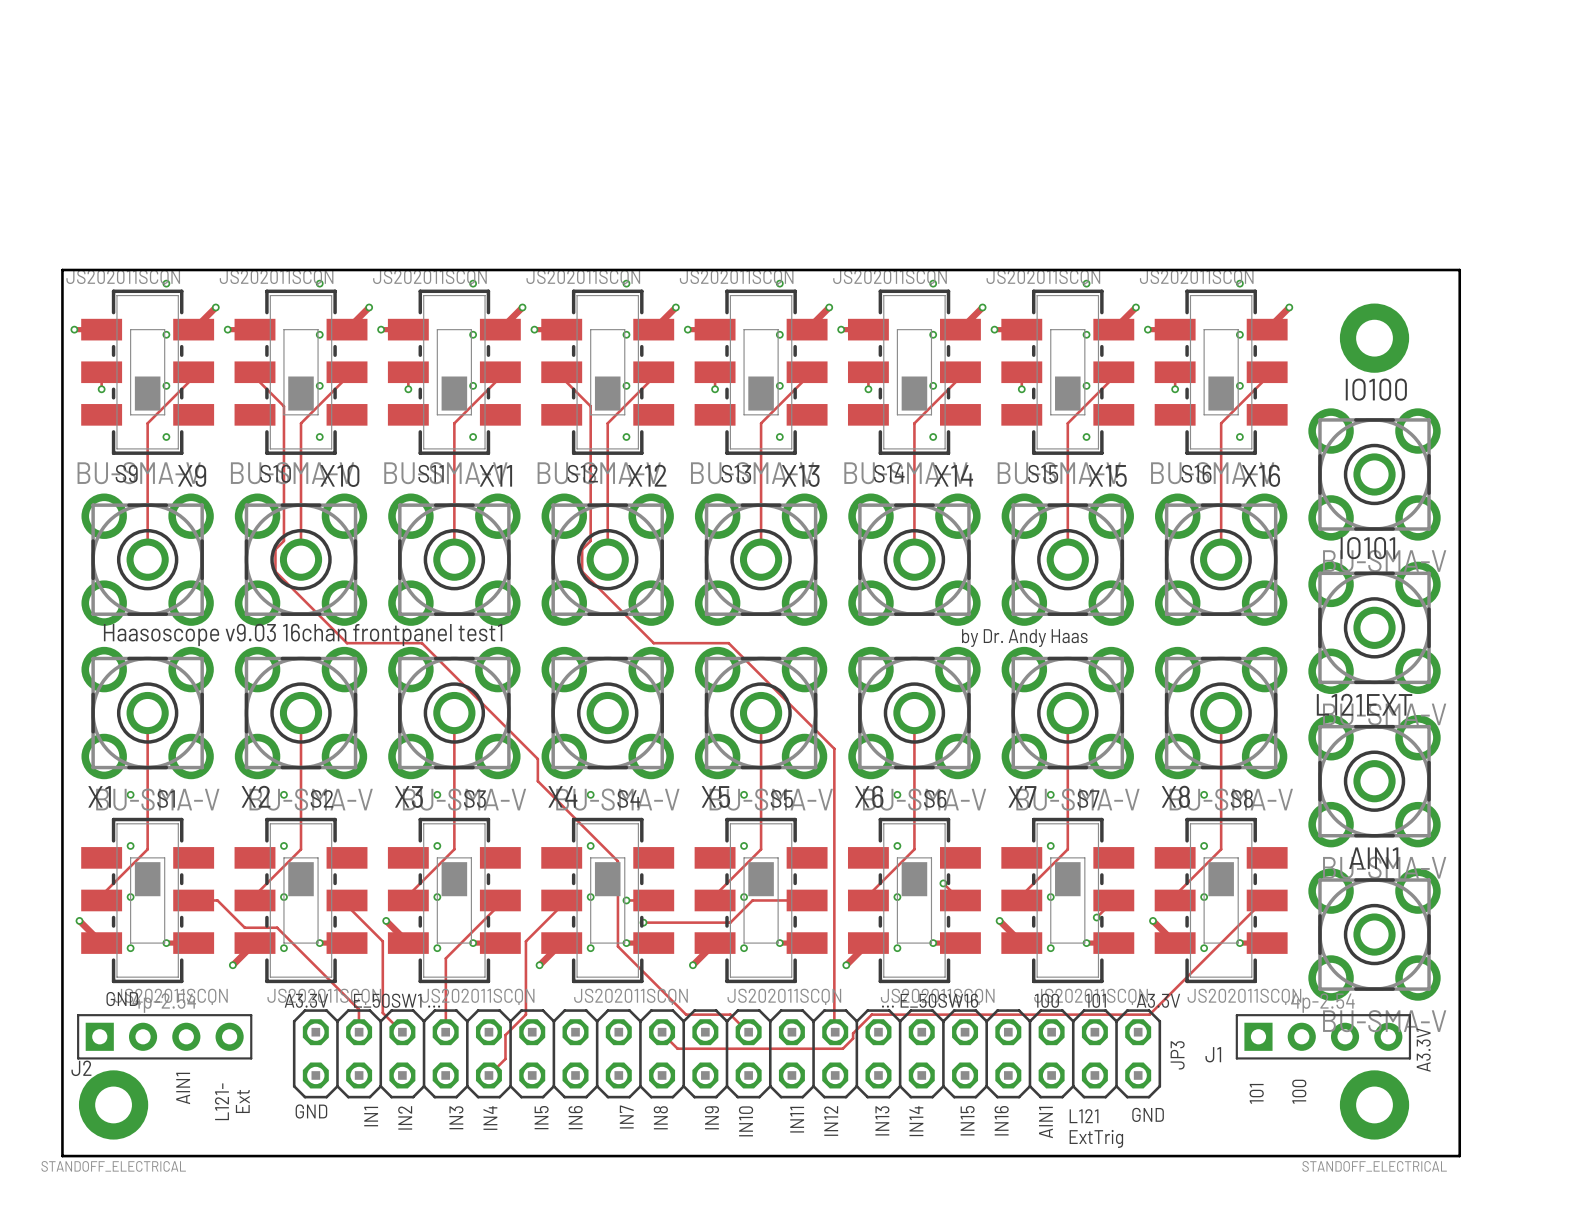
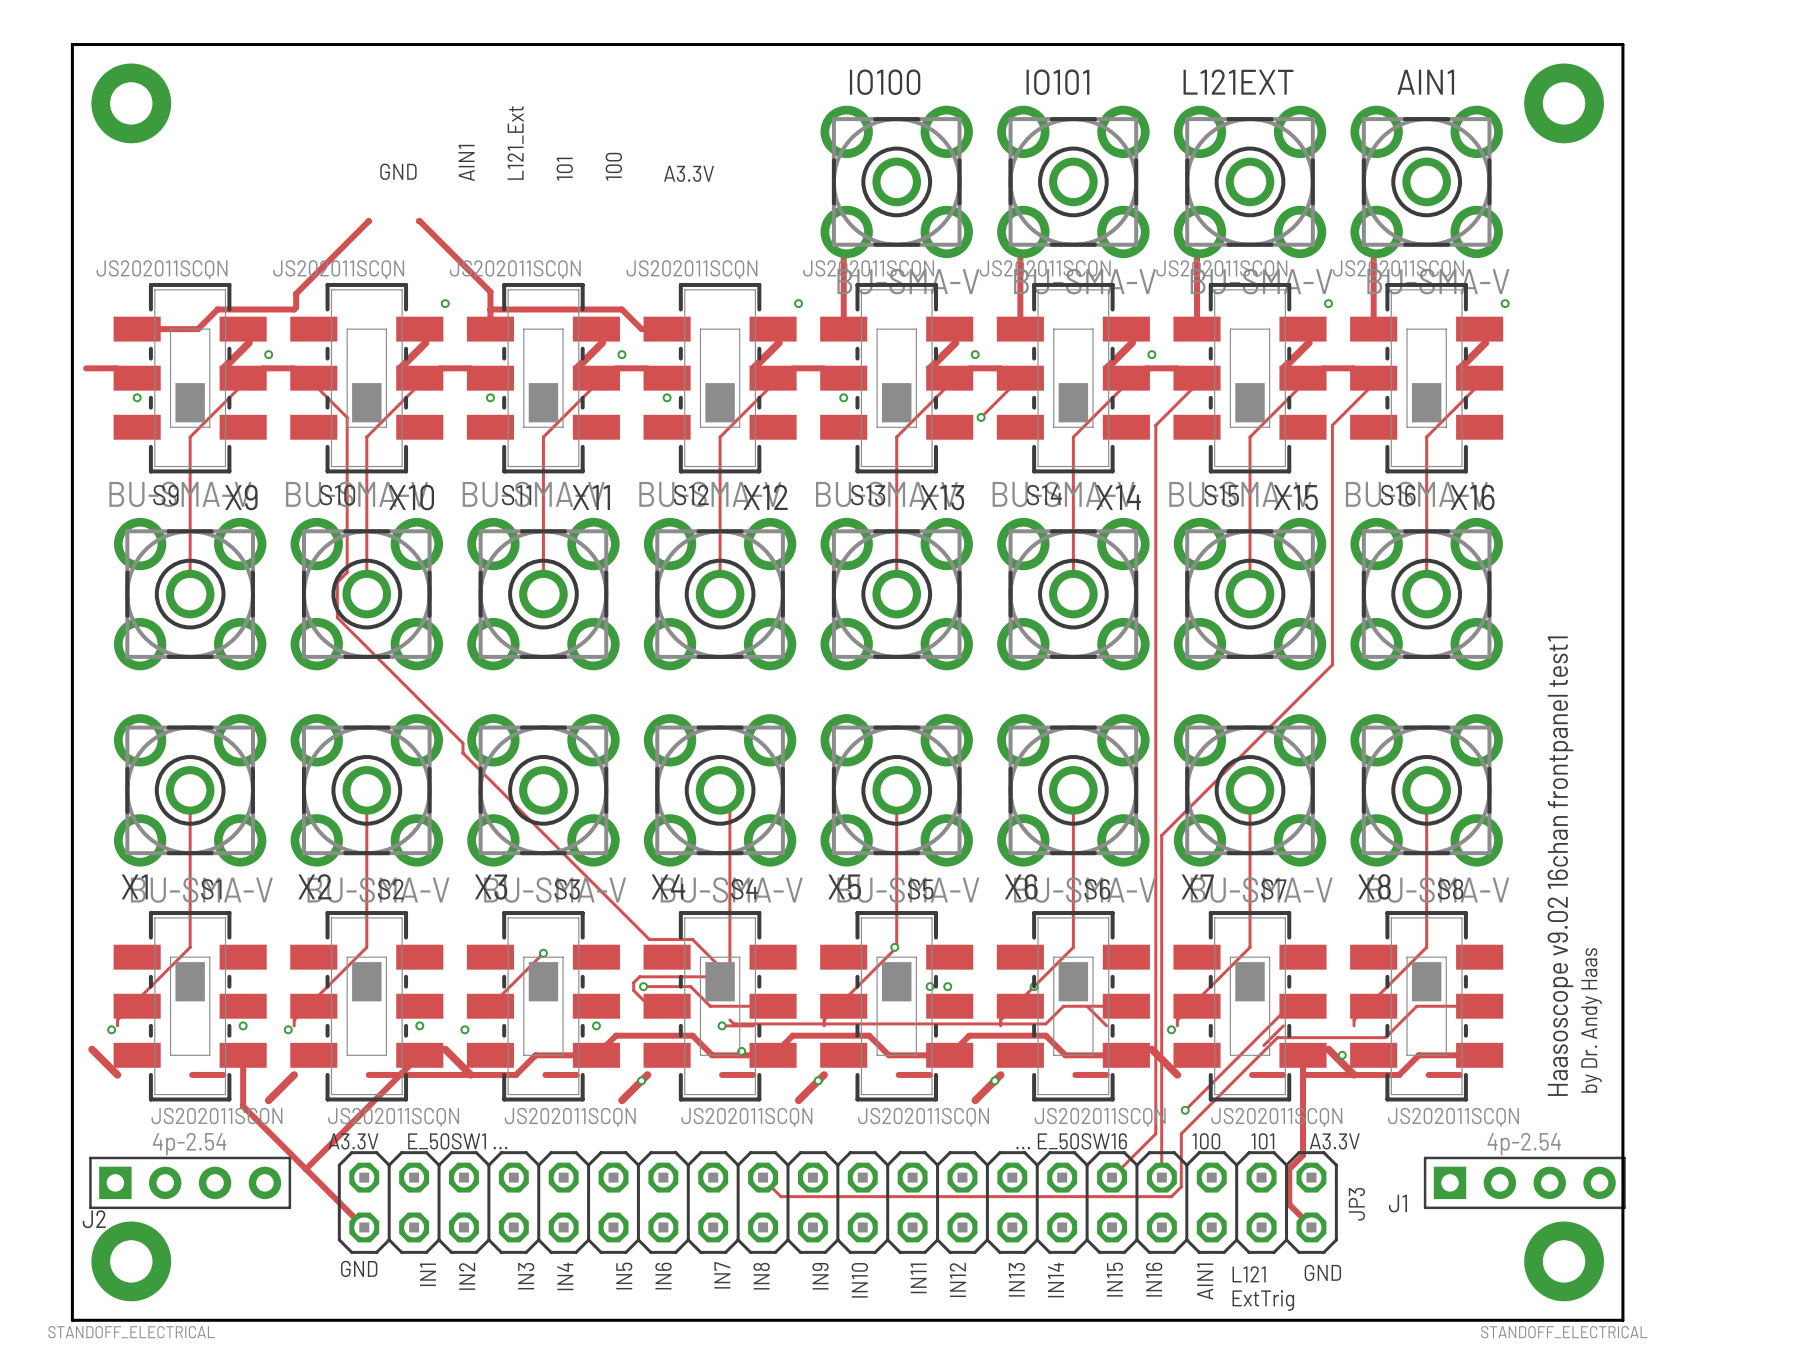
part: none -> (131, 103)
text: none -> L121_Ext (515, 143)
text: none -> AIN1 (466, 162)
text: none -> 100 (613, 166)
text: none -> 101 (564, 169)
text: none -> GND (398, 171)
text: none -> A3.3V (689, 173)
track: none -> (368, 221) (296, 293) (296, 307) (294, 309) (217, 309) (198, 329) (137, 329)
track: none -> (418, 221) (490, 291) (490, 329)
track: none -> (846, 231) (843, 234) (843, 329)
track: none -> (1023, 231) (1020, 234) (1020, 329)
track: none -> (1199, 231) (1197, 234) (1197, 329)
track: none -> (1376, 231) (1373, 234) (1373, 329)
board edge: (62, 270) (1459, 270) (1459, 1156) (1408, 1156) -> (72, 299) (72, 44) (1622, 44) (1622, 1320)
via: none -> (445, 303)
via: none -> (798, 303)
via: none -> (1328, 303)
via: none -> (1505, 303)
track: none -> (490, 309) (621, 309) (641, 329) (667, 329)
via: (166, 283) -> none
via: (319, 283) -> none
via: (473, 283) -> none
via: (626, 283) -> none
via: (779, 283) -> none
via: (933, 283) -> none
via: (1086, 283) -> none
via: (1239, 283) -> none
via: (215, 307) -> none
via: (369, 307) -> none
via: (522, 307) -> none
via: (675, 307) -> none
via: (829, 307) -> none
via: (982, 307) -> none
via: (1135, 307) -> none
via: (1289, 307) -> none
via: none -> (268, 354)
via: none -> (621, 354)
via: none -> (975, 354)
via: none -> (1151, 354)
via: (74, 329) -> none
via: (227, 329) -> none
via: (381, 329) -> none
via: (534, 329) -> none
via: (687, 329) -> none
via: (841, 329) -> none
via: (994, 329) -> none
via: (1147, 329) -> none
via: (166, 334) -> none
via: (319, 334) -> none
via: (473, 334) -> none
via: (626, 334) -> none
via: (779, 334) -> none
via: (933, 334) -> none
via: (1086, 334) -> none
via: (1239, 334) -> none
track: none -> (419, 378) (419, 384) (366, 437) (366, 594)
track: none -> (1020, 378) (981, 417)
track: none -> (1197, 378) (1197, 384) (1155, 425) (1155, 1133) (1112, 1177)
track: none -> (1373, 378) (1373, 384) (1332, 425) (1332, 664) (1161, 835) (1161, 1177)
part position: (1374, 338) -> (1564, 103)
via: none -> (137, 397)
via: none -> (490, 397)
via: none -> (667, 397)
via: none -> (843, 397)
S9 position: (147, 372) -> (190, 378)
track: (193, 372) (193, 377) (147, 423) (147, 559) -> (243, 378) (243, 384) (190, 437) (190, 594)
track: (255, 372) (255, 377) (283, 406) (283, 540) (275, 549) (275, 571) (347, 643) (421, 643) (537, 759) (537, 781) (617, 861) (617, 946) (686, 1014) (730, 1014) (748, 1032) -> none
S10 position: (301, 372) -> (366, 378)
track: (347, 372) (347, 377) (301, 423) -> (313, 378) (313, 384) (347, 417) (347, 476)
S11 position: (454, 372) -> (543, 378)
track: (500, 372) (500, 377) (454, 423) (454, 559) -> (596, 378) (596, 384) (543, 437) (543, 594)
track: (561, 372) (561, 377) (590, 406) (590, 540) (582, 549) (582, 571) (653, 643) (728, 643) (834, 748) (835, 1032) -> none
S12 position: (607, 372) -> (720, 378)
track: (653, 372) (653, 377) (607, 423) (607, 559) -> (773, 378) (773, 384) (720, 437) (720, 594)
S13 position: (761, 372) -> (896, 378)
track: (807, 372) (807, 377) (761, 423) (761, 559) -> (949, 378) (949, 384) (896, 437) (896, 594)
via: none -> (981, 417)
S14 position: (914, 372) -> (1073, 378)
track: (960, 372) (960, 377) (914, 423) (914, 559) -> (1126, 378) (1126, 384) (1073, 437) (1073, 594)
S15 position: (1067, 372) -> (1250, 378)
track: (1113, 372) (1113, 377) (1067, 423) (1067, 559) -> (1303, 378) (1303, 384) (1250, 437) (1250, 594)
S16 position: (1221, 372) -> (1426, 378)
track: (1267, 372) (1267, 377) (1221, 423) (1221, 559) -> (1479, 378) (1479, 384) (1426, 437) (1426, 594)
via: (166, 385) -> none
via: (319, 385) -> none
via: (473, 385) -> none
via: (626, 385) -> none
via: (779, 385) -> none
via: (933, 385) -> none
via: (1086, 385) -> none
via: (1239, 385) -> none
via: (101, 389) -> none
via: (408, 389) -> none
via: (715, 389) -> none
via: (868, 389) -> none
via: (1021, 389) -> none
via: (1175, 389) -> none
IO100 name position: IO100 (1376, 389) -> IO100 (885, 82)
via: (166, 436) -> none
via: (319, 436) -> none
via: (473, 436) -> none
via: (626, 436) -> none
via: (779, 436) -> none
via: (933, 436) -> none
via: (1086, 436) -> none
via: (1239, 436) -> none
IO100 position: (1374, 474) -> (896, 181)
track: (301, 506) (301, 559) -> (347, 572) (337, 582) (337, 617) (462, 743) (462, 753) (649, 939) (692, 939) (720, 967)
IO101 name position: IO101 (1367, 548) -> IO101 (1057, 82)
X9 position: (147, 559) -> (190, 594)
X10 position: (301, 559) -> (366, 594)
X11 position: (454, 559) -> (543, 594)
X12 position: (607, 559) -> (720, 594)
X13 position: (761, 559) -> (896, 594)
X14 position: (914, 559) -> (1073, 594)
X15 position: (1067, 559) -> (1250, 594)
X16 position: (1221, 559) -> (1426, 594)
IO101 position: (1374, 627) -> (1073, 181)
text: Haasoscope v9.03 16chan frontpanel test1 (303, 634) -> none
text: by Dr. Andy Haas (1024, 638) -> none
track: none -> (720, 790) (729, 800) (729, 970) (724, 976) (639, 976) (633, 982) (633, 990) (649, 1006) (667, 1006)
L121EXT name position: L121EXT (1364, 704) -> L121EXT (1238, 82)
track: (147, 713) (147, 849) -> (190, 790) (190, 947) (170, 967)
X1 position: (147, 713) -> (190, 790)
track: (301, 713) (301, 849) -> (366, 790) (366, 947) (347, 967)
X2 position: (301, 713) -> (366, 790)
track: (454, 713) (454, 849) (408, 895) (408, 900) -> none
X3 position: (454, 713) -> (543, 790)
X4 position: (607, 713) -> (720, 790)
track: (761, 713) (761, 849) -> (896, 790) (896, 947) (877, 967)
X5 position: (761, 713) -> (896, 790)
track: (914, 713) (914, 849) -> (1073, 790) (1073, 947) (1053, 967)
X6 position: (914, 713) -> (1073, 790)
track: (1067, 713) (1067, 849) -> (1250, 790) (1250, 947) (1230, 967)
X7 position: (1067, 713) -> (1250, 790)
track: (1221, 713) (1221, 849) -> (1426, 790) (1426, 947) (1407, 967)
X8 position: (1221, 713) -> (1426, 790)
text: none -> Haasoscope v9.02 16chan frontpanel test1 (1560, 866)
L121EXT position: (1374, 781) -> (1250, 181)
via: (130, 794) -> none
via: (283, 794) -> none
via: (437, 794) -> none
via: (590, 794) -> none
via: (744, 794) -> none
via: (897, 794) -> none
via: (1050, 794) -> none
via: (1204, 794) -> none
via: none -> (894, 947)
track: none -> (543, 953) (490, 1006)
via: none -> (543, 953)
via: (130, 845) -> none
via: (283, 845) -> none
via: (437, 845) -> none
via: (590, 845) -> none
via: (744, 845) -> none
via: (897, 845) -> none
via: (1050, 845) -> none
via: (1204, 845) -> none
AIN1 name position: AIN1 (1373, 858) -> AIN1 (1425, 82)
track: none -> (643, 986) (690, 986) (710, 1006) (773, 1006)
via: none -> (643, 986)
via: none -> (930, 986)
via: none -> (947, 986)
via: none -> (1034, 986)
via: (943, 883) -> none
track: none -> (1126, 1006) (1063, 1006) (1045, 1023) (733, 1023) (729, 1019)
track: none -> (1303, 1006) (1289, 1006) (1185, 1110)
text: none -> by Dr. Andy Haas (1591, 1020)
via: (130, 897) -> none
via: (283, 897) -> none
via: (437, 897) -> none
via: (590, 897) -> none
via: (744, 897) -> none
via: (897, 897) -> none
via: (1050, 897) -> none
via: (1204, 897) -> none
S1 position: (147, 900) -> (190, 1006)
track: (193, 900) (217, 900) (244, 927) (277, 927) (358, 1009) (359, 1032) -> none
via: none -> (243, 1025)
S2 position: (301, 900) -> (366, 1006)
track: (347, 900) (347, 905) (382, 941) (382, 1012) (402, 1032) -> none
via: none -> (419, 1025)
S3 position: (454, 900) -> (543, 1006)
track: (500, 900) (500, 903) (445, 958) (445, 1032) -> none
via: none -> (596, 1025)
track: (561, 900) (561, 905) (525, 941) (525, 1014) (505, 1035) (505, 1058) (488, 1075) -> none
S4 position: (607, 900) -> (720, 1006)
S5 position: (761, 900) -> (896, 1006)
track: (807, 900) (752, 900) (730, 922) (643, 922) -> none
S6 position: (914, 900) -> (1073, 1006)
S7 position: (1067, 900) -> (1250, 1006)
S8 position: (1221, 900) -> (1426, 1006)
track: (1267, 900) (1263, 900) (1149, 1014) (871, 1014) (853, 1033) (853, 1038) (842, 1048) -> (1479, 1006) (1416, 1006) (1385, 1037) (1277, 1037) (1181, 1133) (1181, 1186) (1171, 1196) (971, 1196)
via: none -> (111, 1029)
via: none -> (288, 1029)
via: none -> (464, 1029)
via: none -> (1171, 1029)
via: (1096, 917) -> none
via: (79, 920) -> none
via: (386, 920) -> none
via: (999, 920) -> none
via position: (1152, 920) -> (1342, 1055)
track: none -> (243, 1055) (243, 1106) (364, 1227)
track: none -> (419, 1055) (305, 1169)
track: none -> (1126, 1055) (1065, 1055) (1045, 1035) (969, 1035) (949, 1055) (888, 1055) (869, 1035) (792, 1035) (773, 1055) (712, 1055) (692, 1035) (616, 1035) (596, 1055) (535, 1055) (515, 1074) (404, 1074) (402, 1072)
track: none -> (1303, 1055) (1303, 1155) (1289, 1169) (1289, 1204) (1311, 1227)
track: none -> (1479, 1055) (1418, 1055) (1399, 1074) (1303, 1074)
AIN1 position: (1374, 934) -> (1426, 181)
via: (166, 943) -> none
via: (319, 943) -> none
via: (473, 943) -> none
via: (626, 943) -> none
via: (779, 943) -> none
via: (933, 943) -> none
via: (1086, 943) -> none
via: (1239, 943) -> none
via: (130, 948) -> none
via: (283, 948) -> none
via: (437, 948) -> none
via: none -> (641, 1080)
via: (590, 948) -> none
via: none -> (818, 1080)
via: (744, 948) -> none
via: none -> (994, 1080)
via: (897, 948) -> none
via: (1050, 948) -> none
via: (1204, 948) -> none
via: (232, 965) -> none
via: (539, 965) -> none
via: (692, 965) -> none
via: (846, 965) -> none
via: none -> (1185, 1110)
text: GND (122, 999) -> none
text: A3.3V (1423, 1050) -> none
text: AIN1 (183, 1088) -> none
text: 100 (1299, 1091) -> none
text: 101 (1256, 1093) -> none
text: L121- (221, 1101) -> none
text: Ext (242, 1101) -> none
part position: (1374, 1104) -> (1564, 1261)

